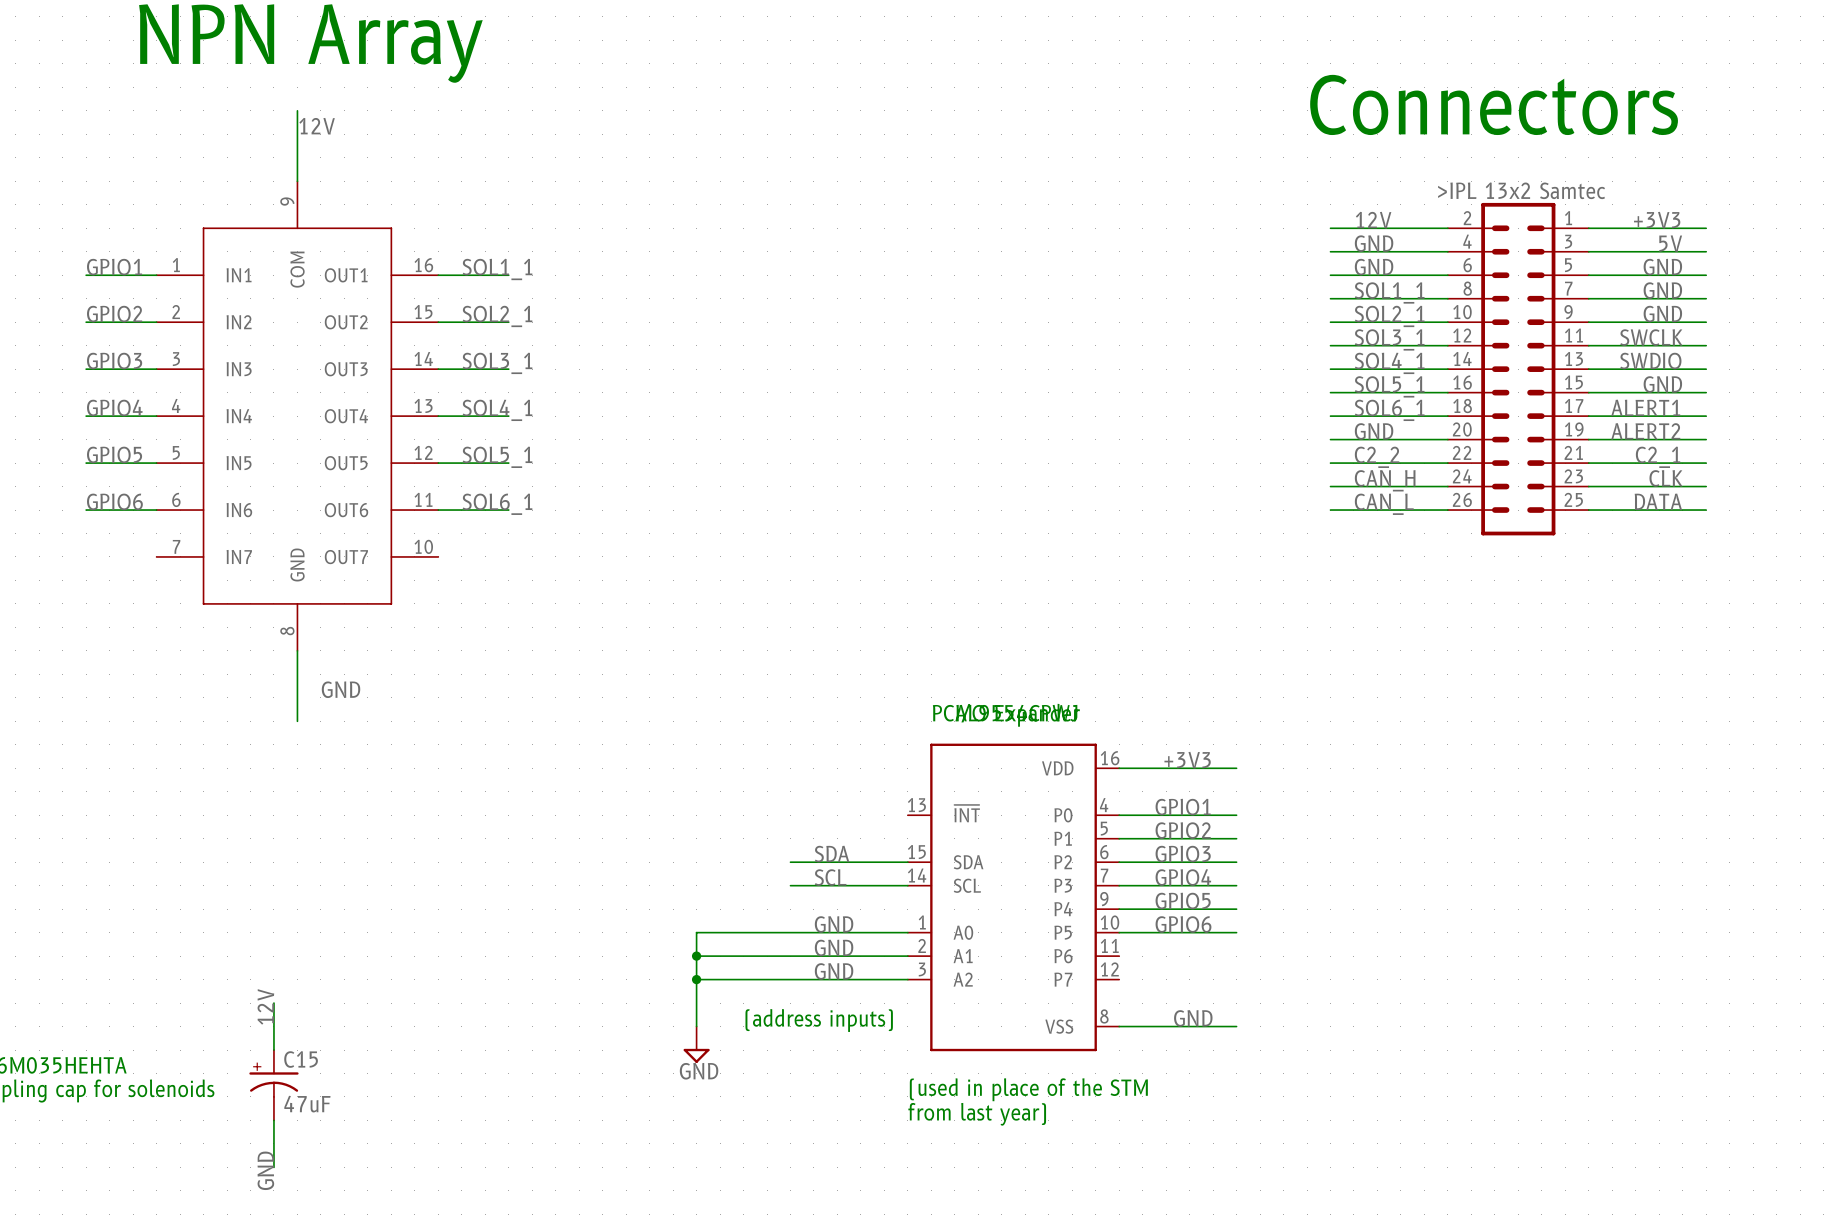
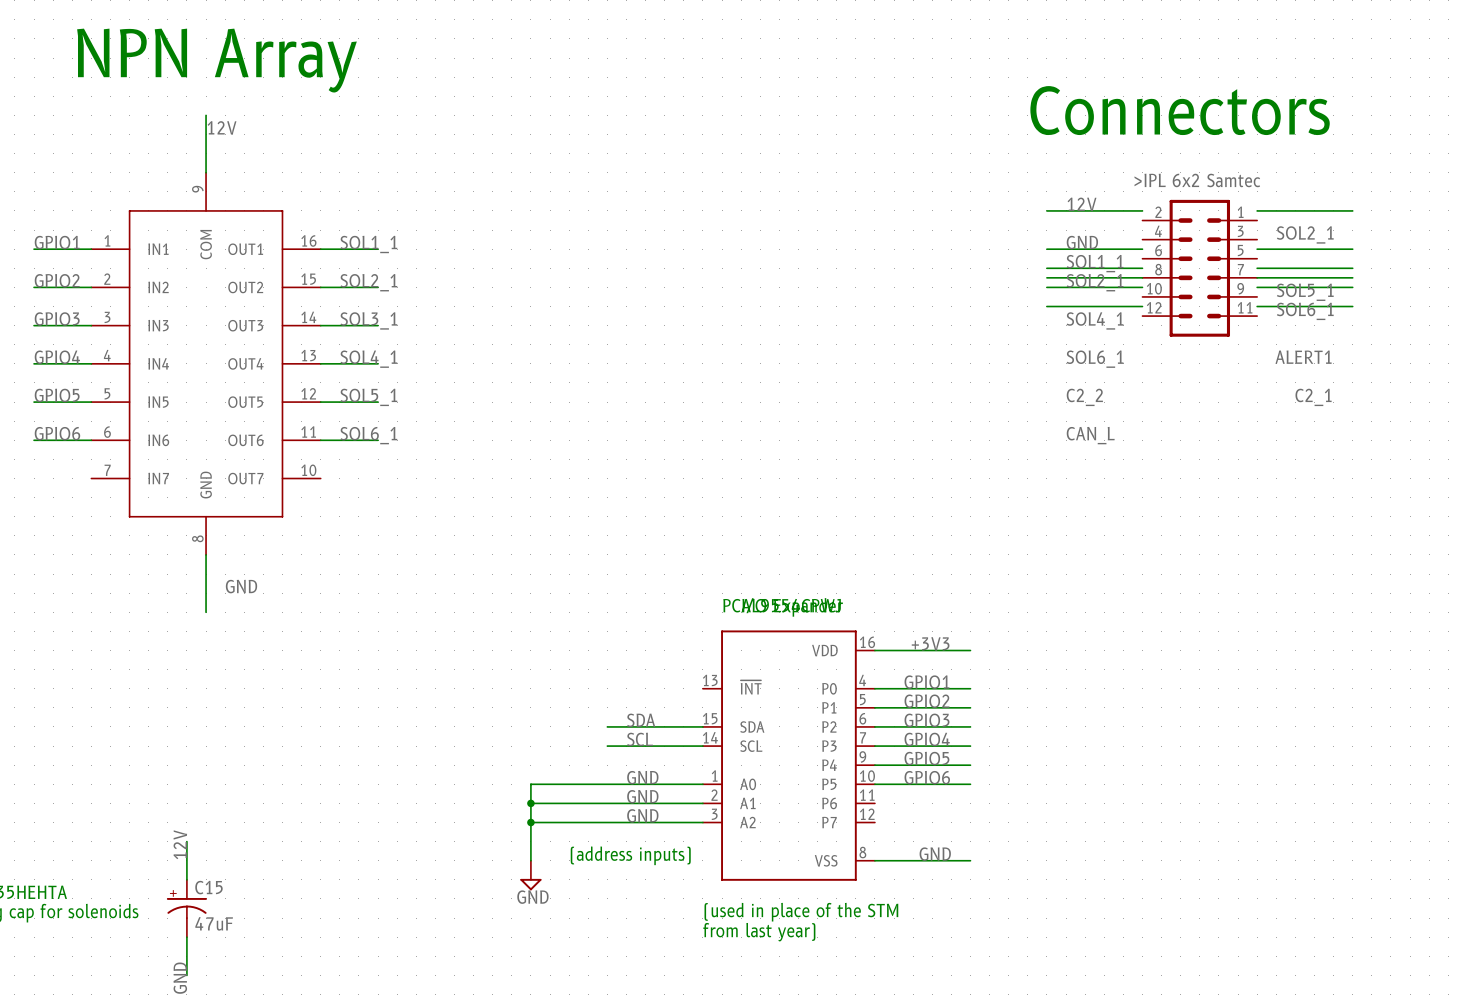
label: +3V3 (1657, 220) -> none
label: GND (1374, 243) -> none
label: 5V (1670, 243) -> none
wire: (1330, 251) (1447, 251) -> (1046, 277) (1142, 277)
wire: (1588, 251) (1706, 251) -> (1257, 277) (1352, 277)
label: none -> SOL2_1 (1305, 234)
label: GND (1662, 267) -> none
label: GND (1662, 290) -> none
part: none -> (1199, 268)
label: GND (1662, 314) -> none
label: none -> SOL5_1 (1305, 292)
label: SWCLK (1651, 337) -> none
label: SOL3_1 (1389, 339) -> none
label: none -> SOL6_1 (1305, 311)
label: SWDIO (1650, 361) -> none
wire: (1330, 369) (1447, 369) -> none
part: (1518, 369) -> none
wire: (1588, 369) (1706, 369) -> none
label: GND (1662, 384) -> none
label: SOL5_1 (1389, 386) -> none
wire: (1330, 392) (1447, 392) -> none
wire: (1588, 392) (1706, 392) -> none
wire: (1330, 416) (1447, 416) -> none
wire: (1588, 416) (1706, 416) -> none
label: GND (1374, 431) -> none
label: ALERT2 (1645, 431) -> none
wire: (1330, 439) (1447, 439) -> none
wire: (1588, 439) (1706, 439) -> none
wire: (1330, 463) (1447, 463) -> none
wire: (1588, 463) (1706, 463) -> none
label: CLK (1666, 478) -> none
label: CAN_H (1385, 480) -> none
wire: (1330, 486) (1447, 486) -> none
wire: (1588, 486) (1706, 486) -> none
label: DATA (1658, 501) -> none
wire: (1330, 510) (1447, 510) -> none
wire: (1588, 510) (1706, 510) -> none

